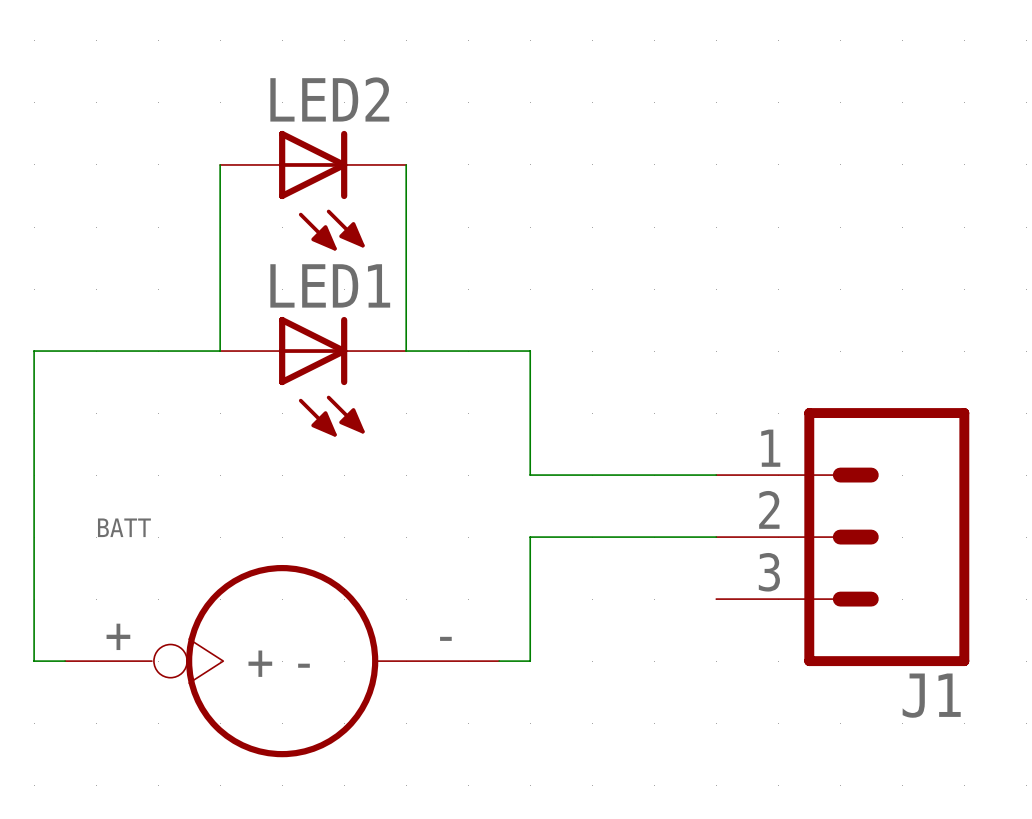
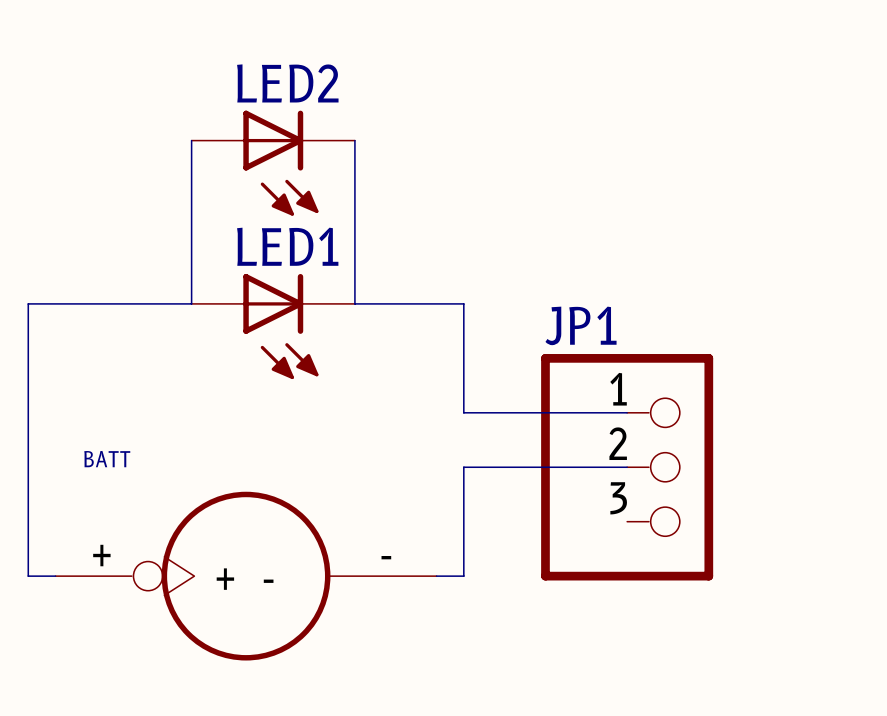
JP1: none -> (627, 467)
J1: (842, 537) -> none

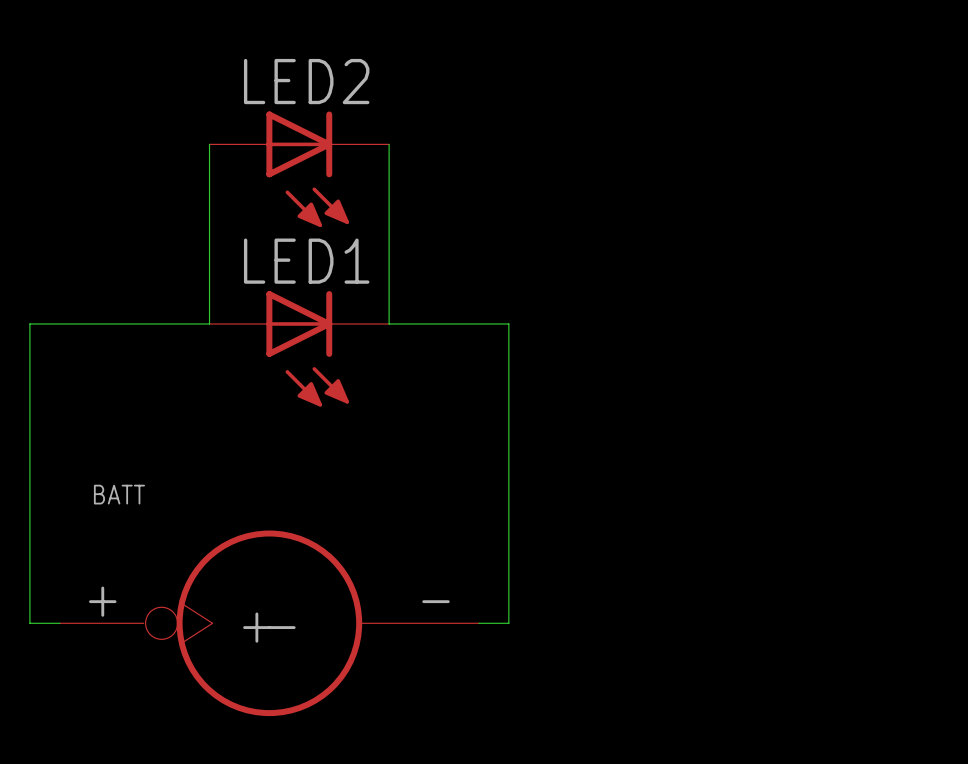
wire: (463, 412) (627, 412) -> (508, 443) (508, 503)
wire: (463, 467) (627, 467) -> none
JP1: (627, 467) -> none

